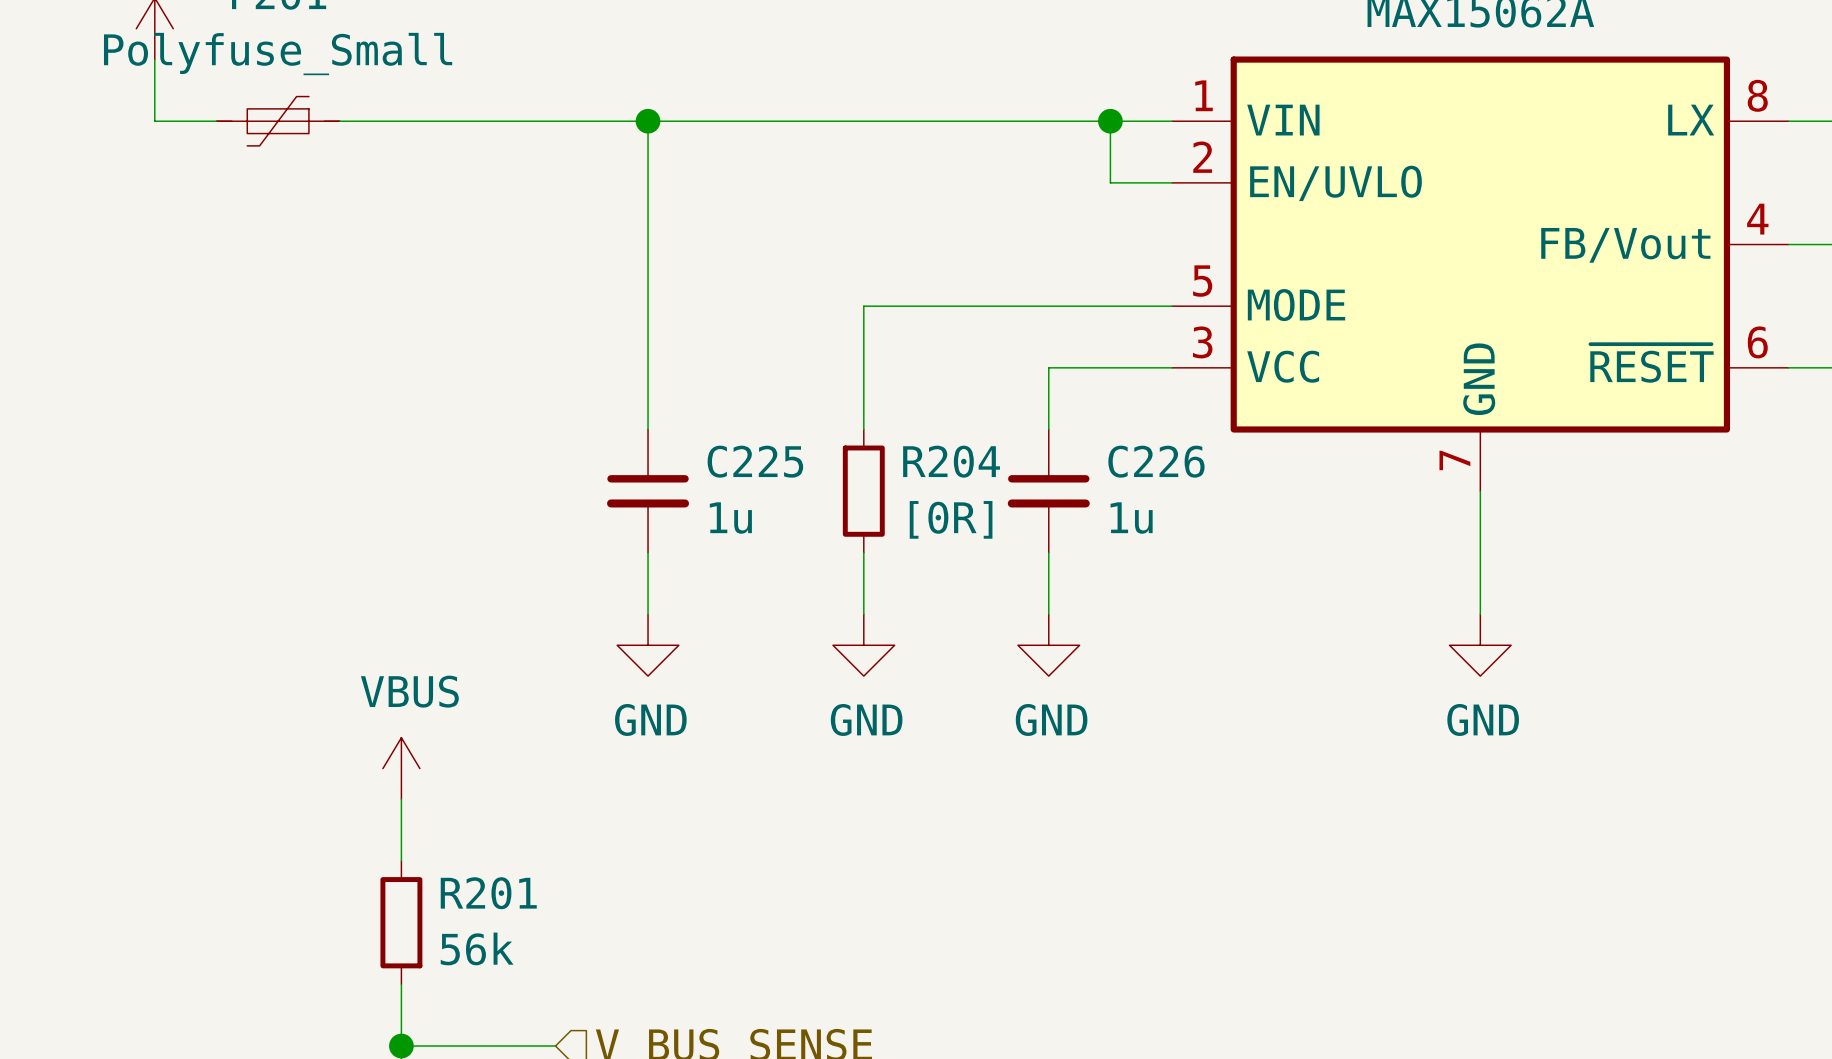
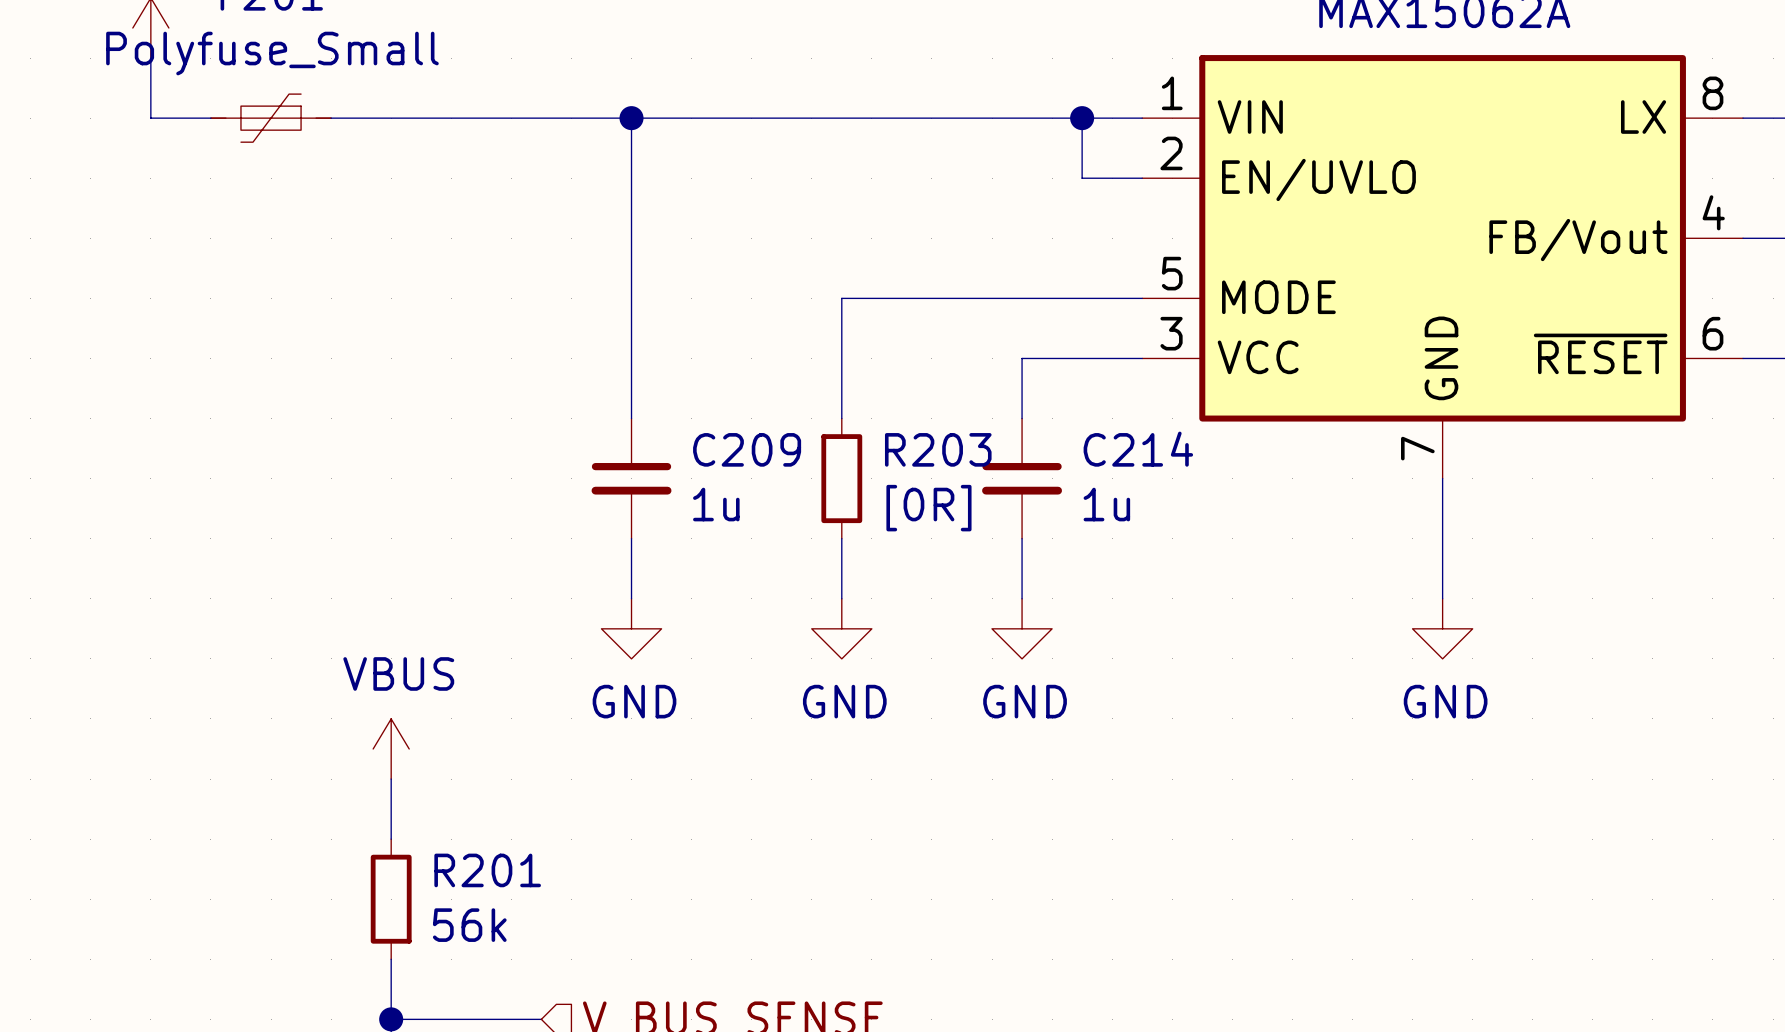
C225 name: C225 (755, 461) -> C209 (747, 449)
R204 name: R204 (951, 461) -> R203 (938, 449)
C226 name: C226 (1156, 461) -> C214 (1138, 449)

